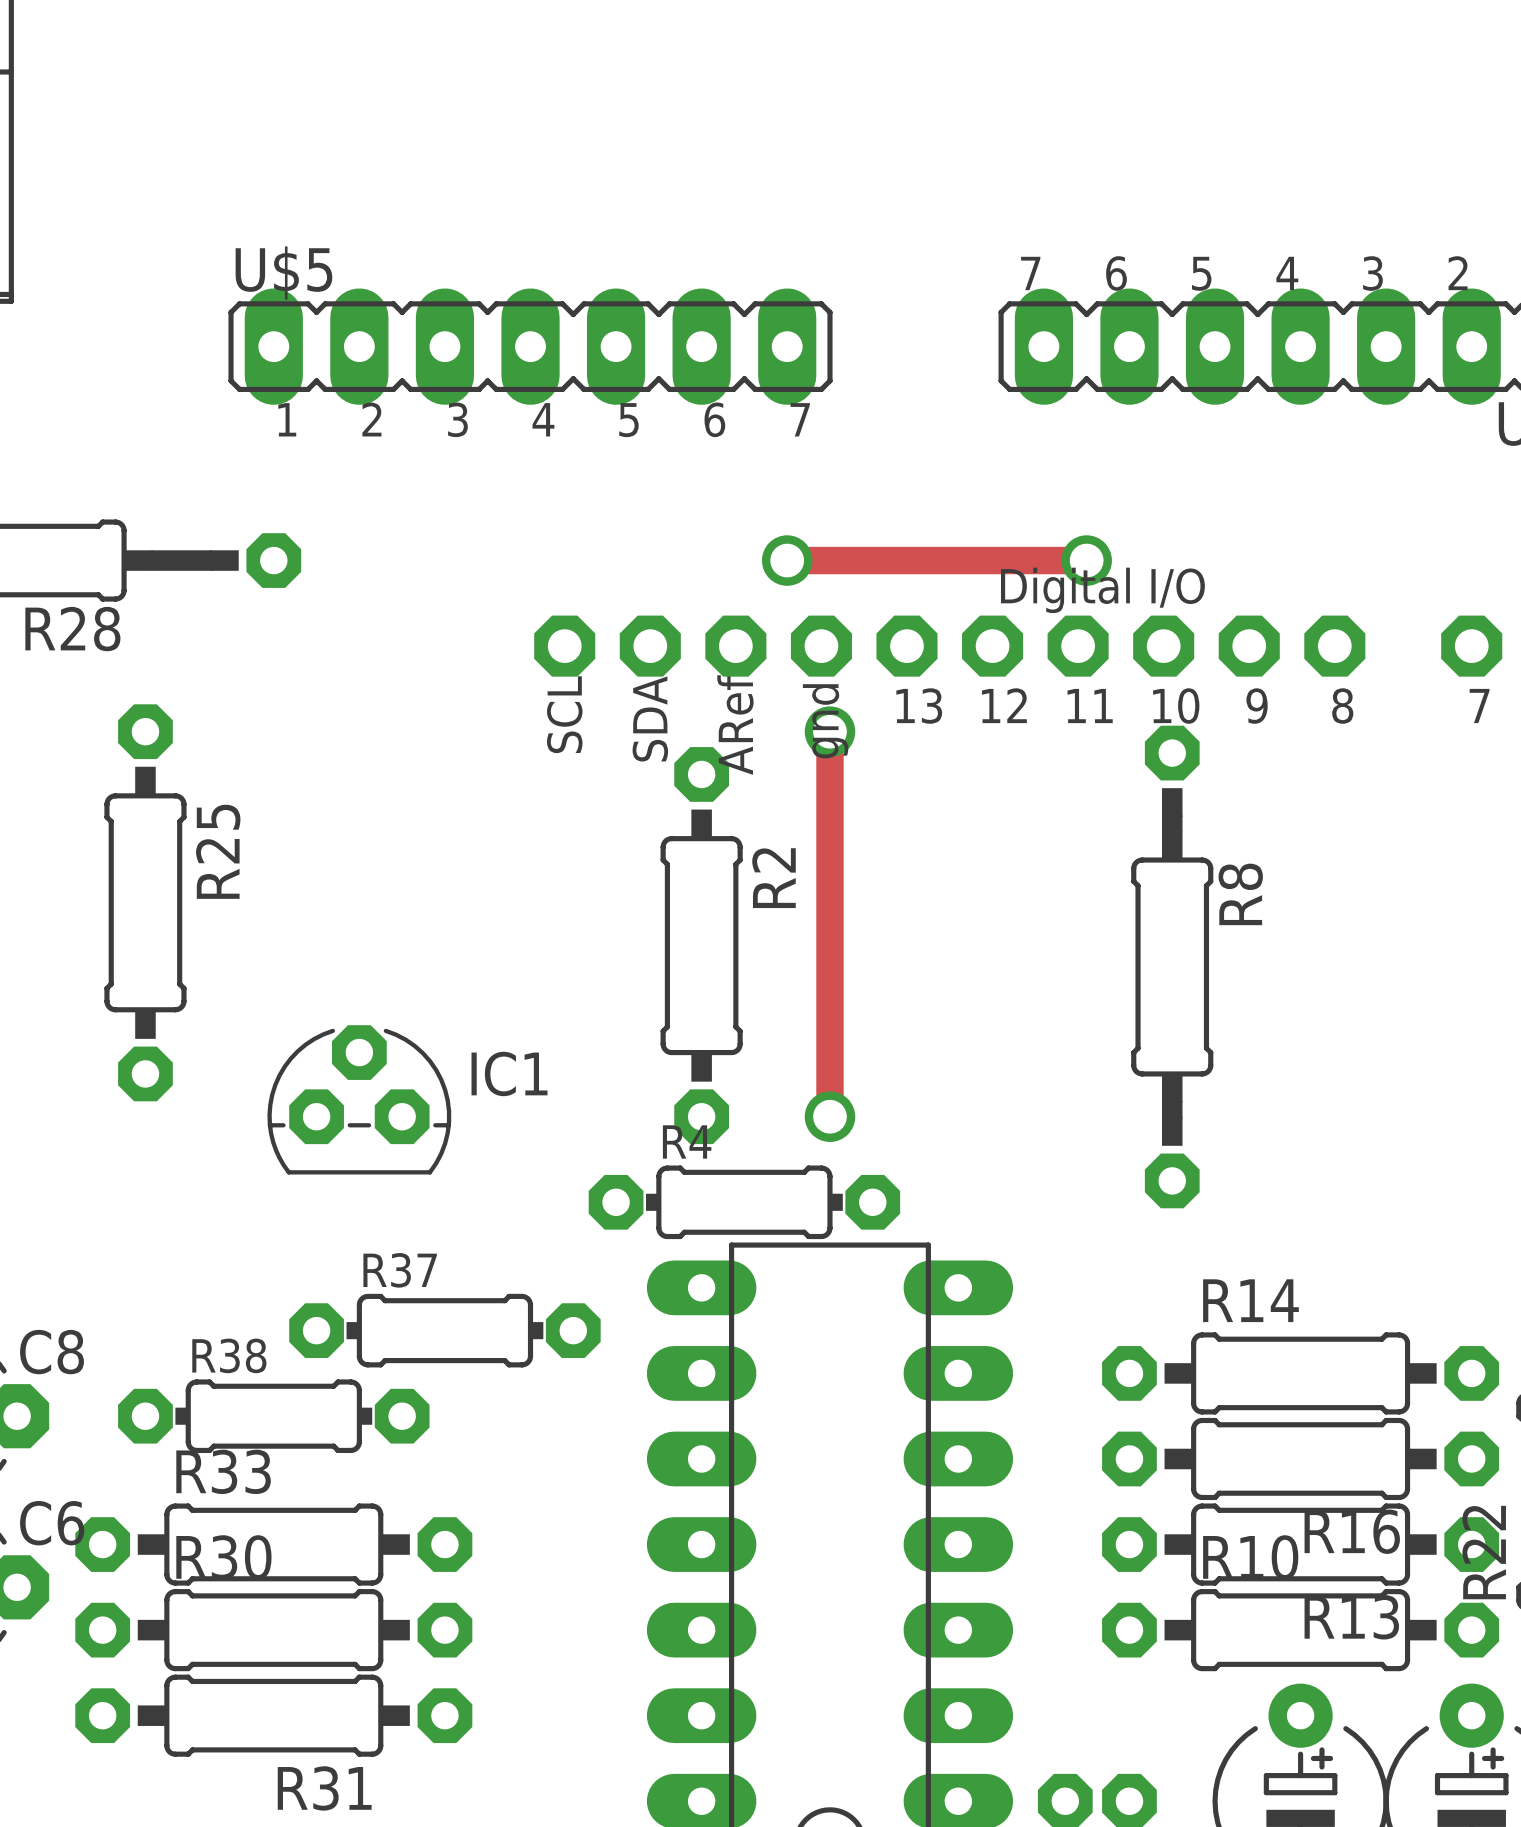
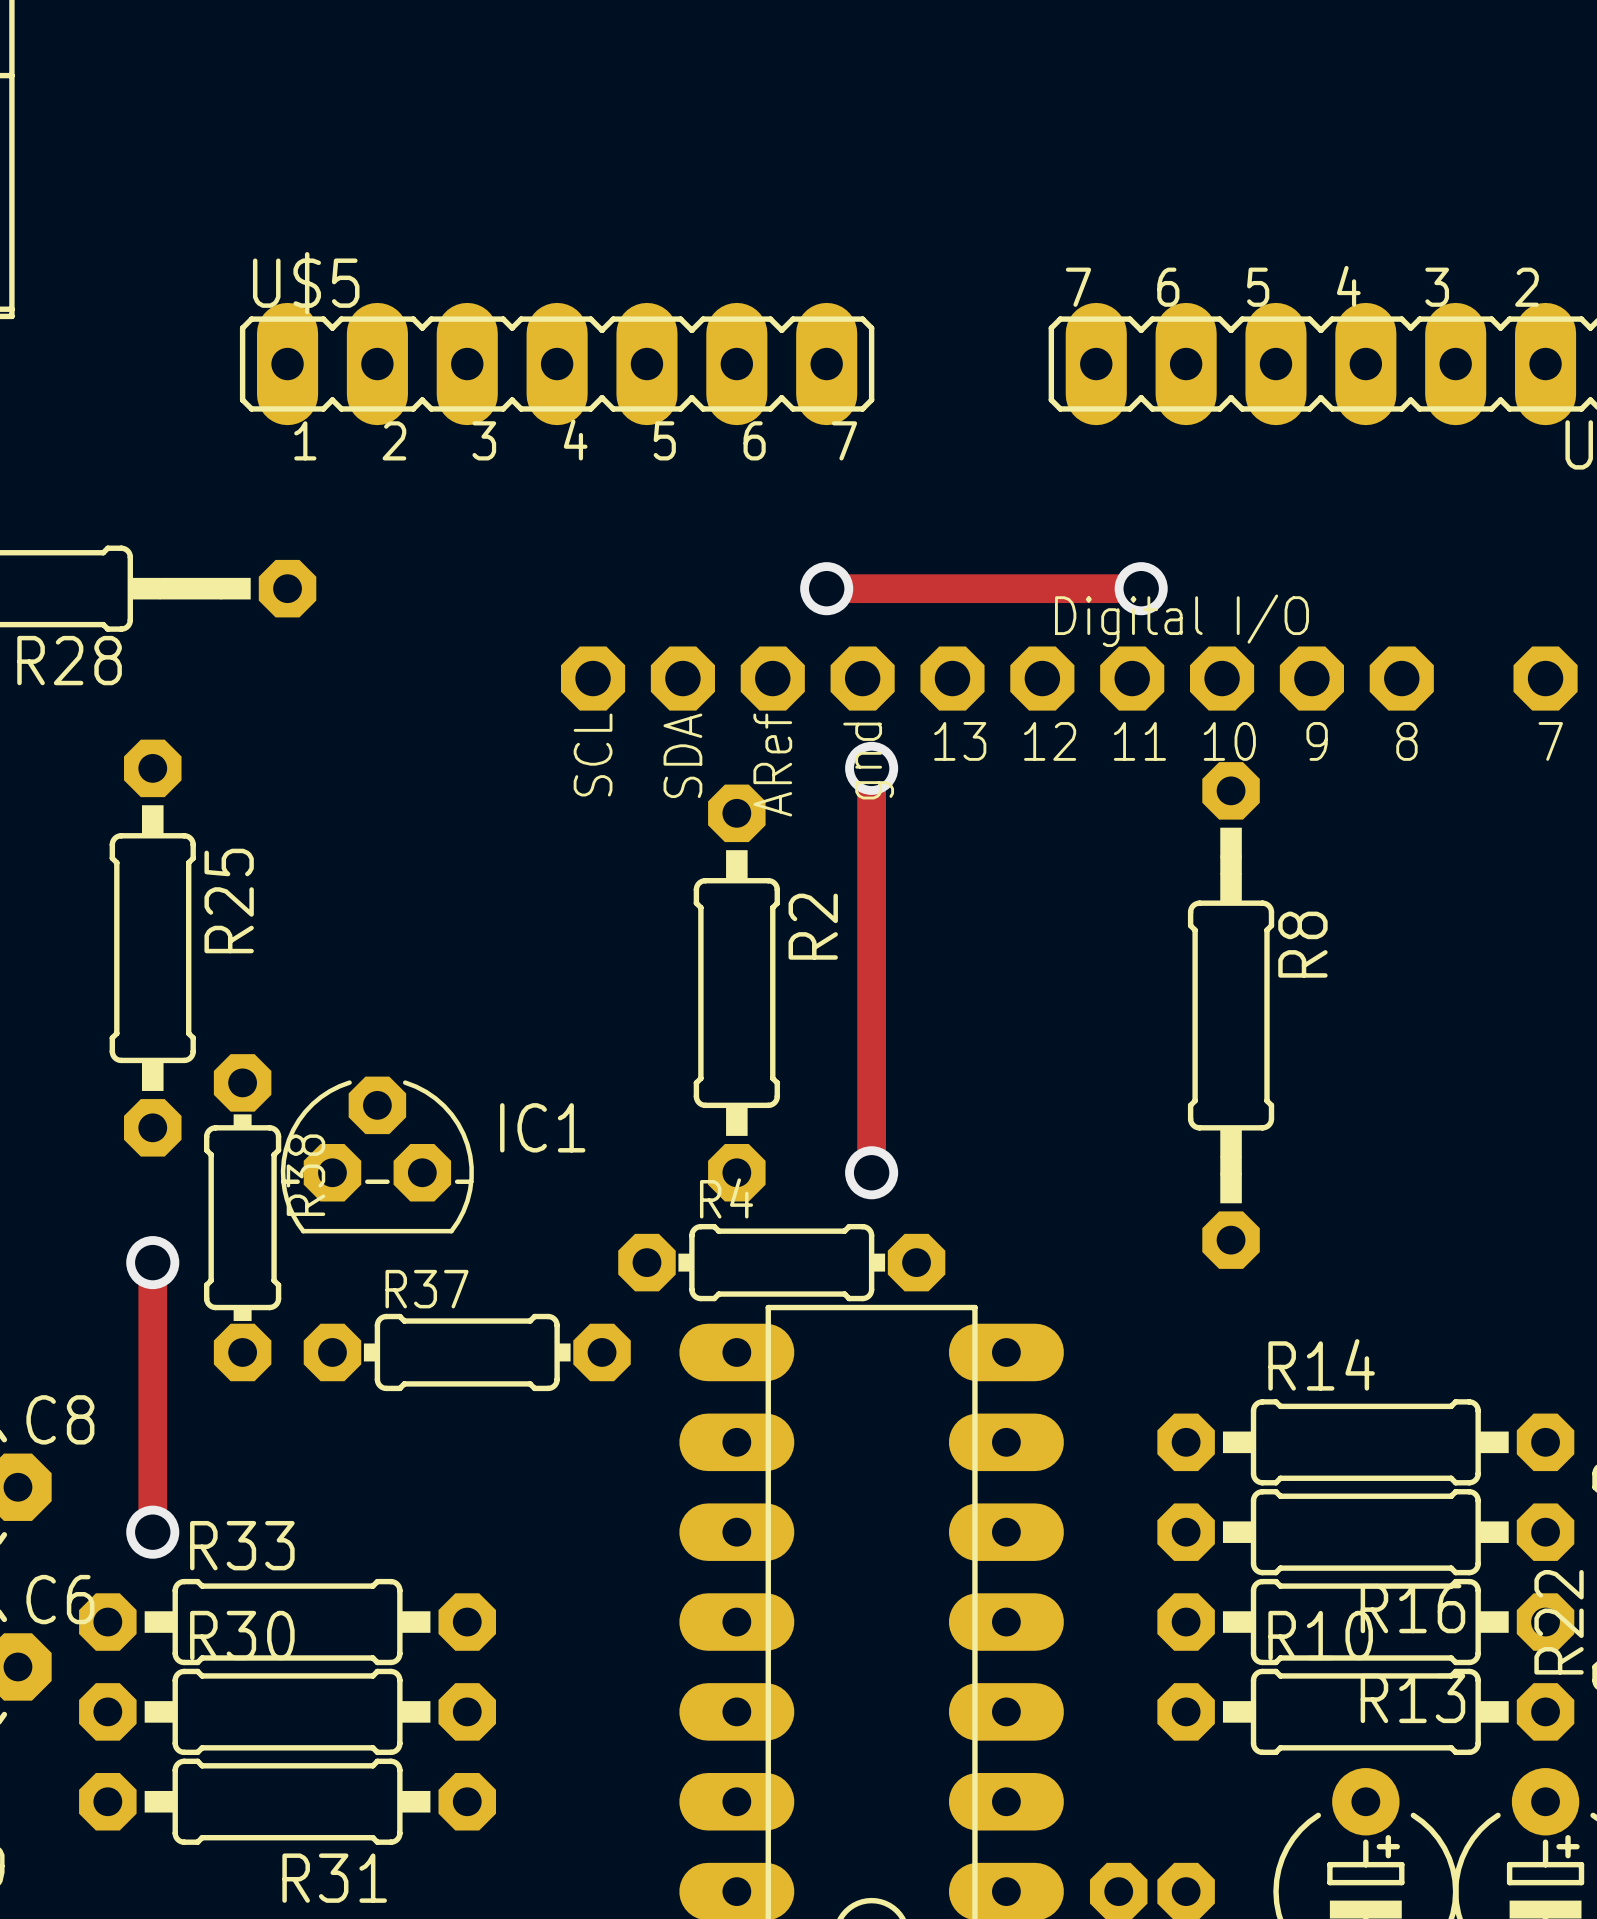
track: none -> (152, 1262) (152, 1532)
via: none -> (152, 1262)
R37 position: (444, 1330) -> (467, 1352)
R38 rotation: 0° (273, 1416) -> 90° clockwise (242, 1217)
R38 position: (273, 1416) -> (242, 1217)
via: none -> (152, 1532)

